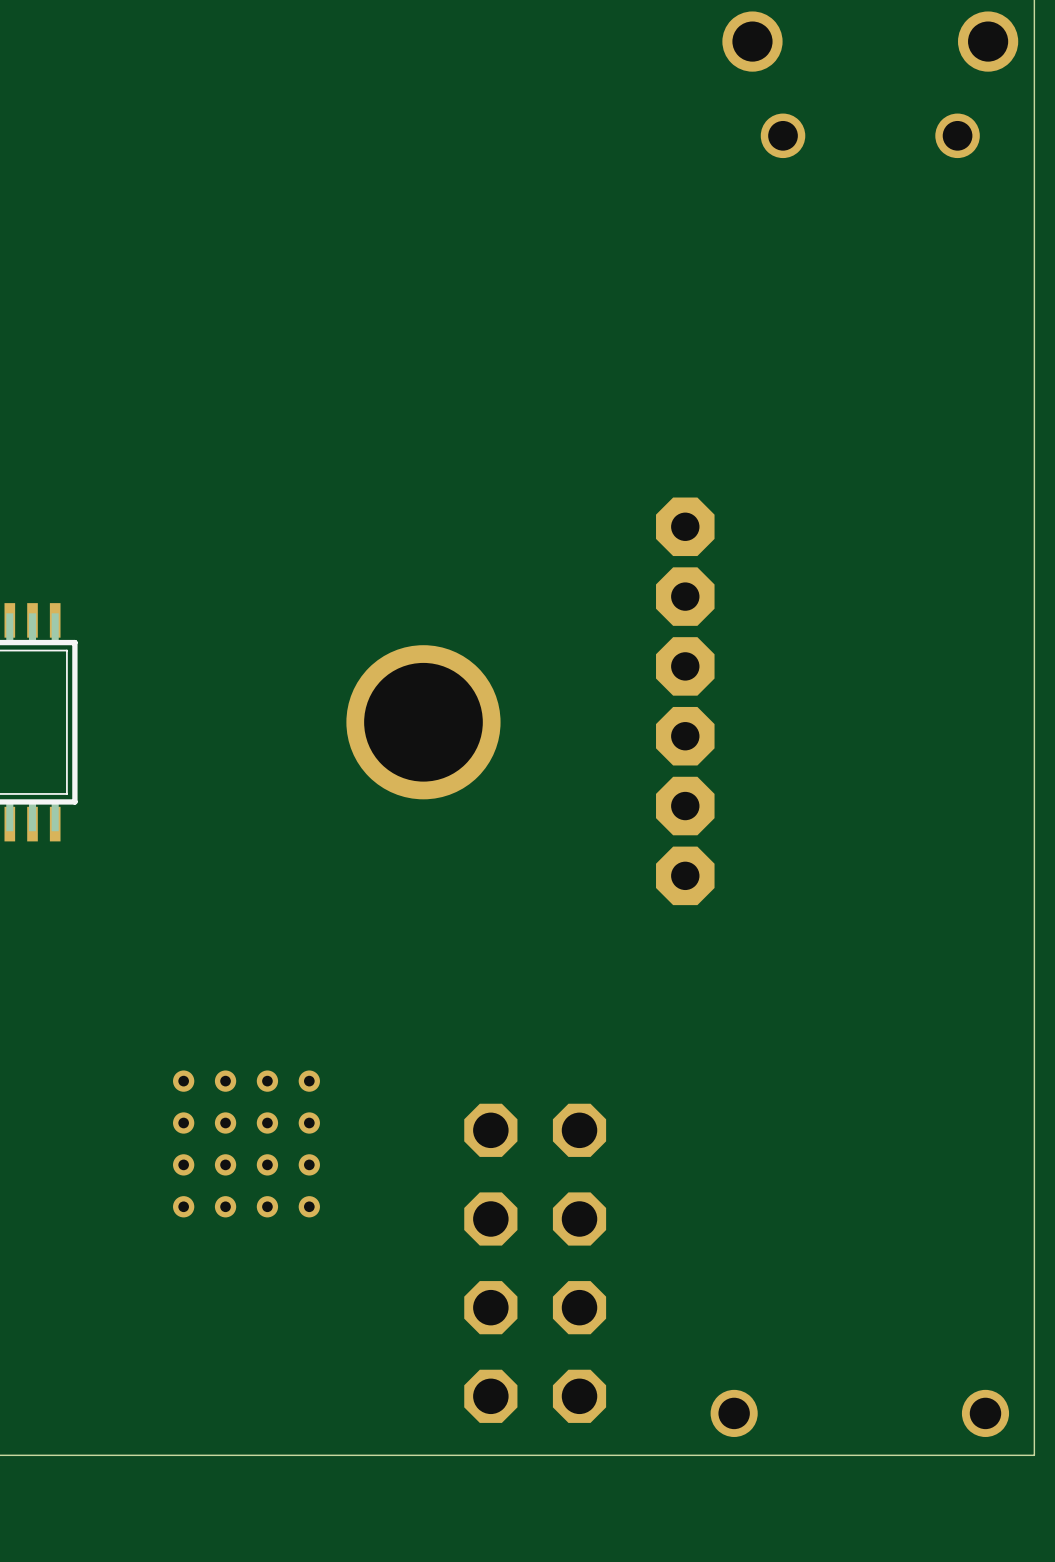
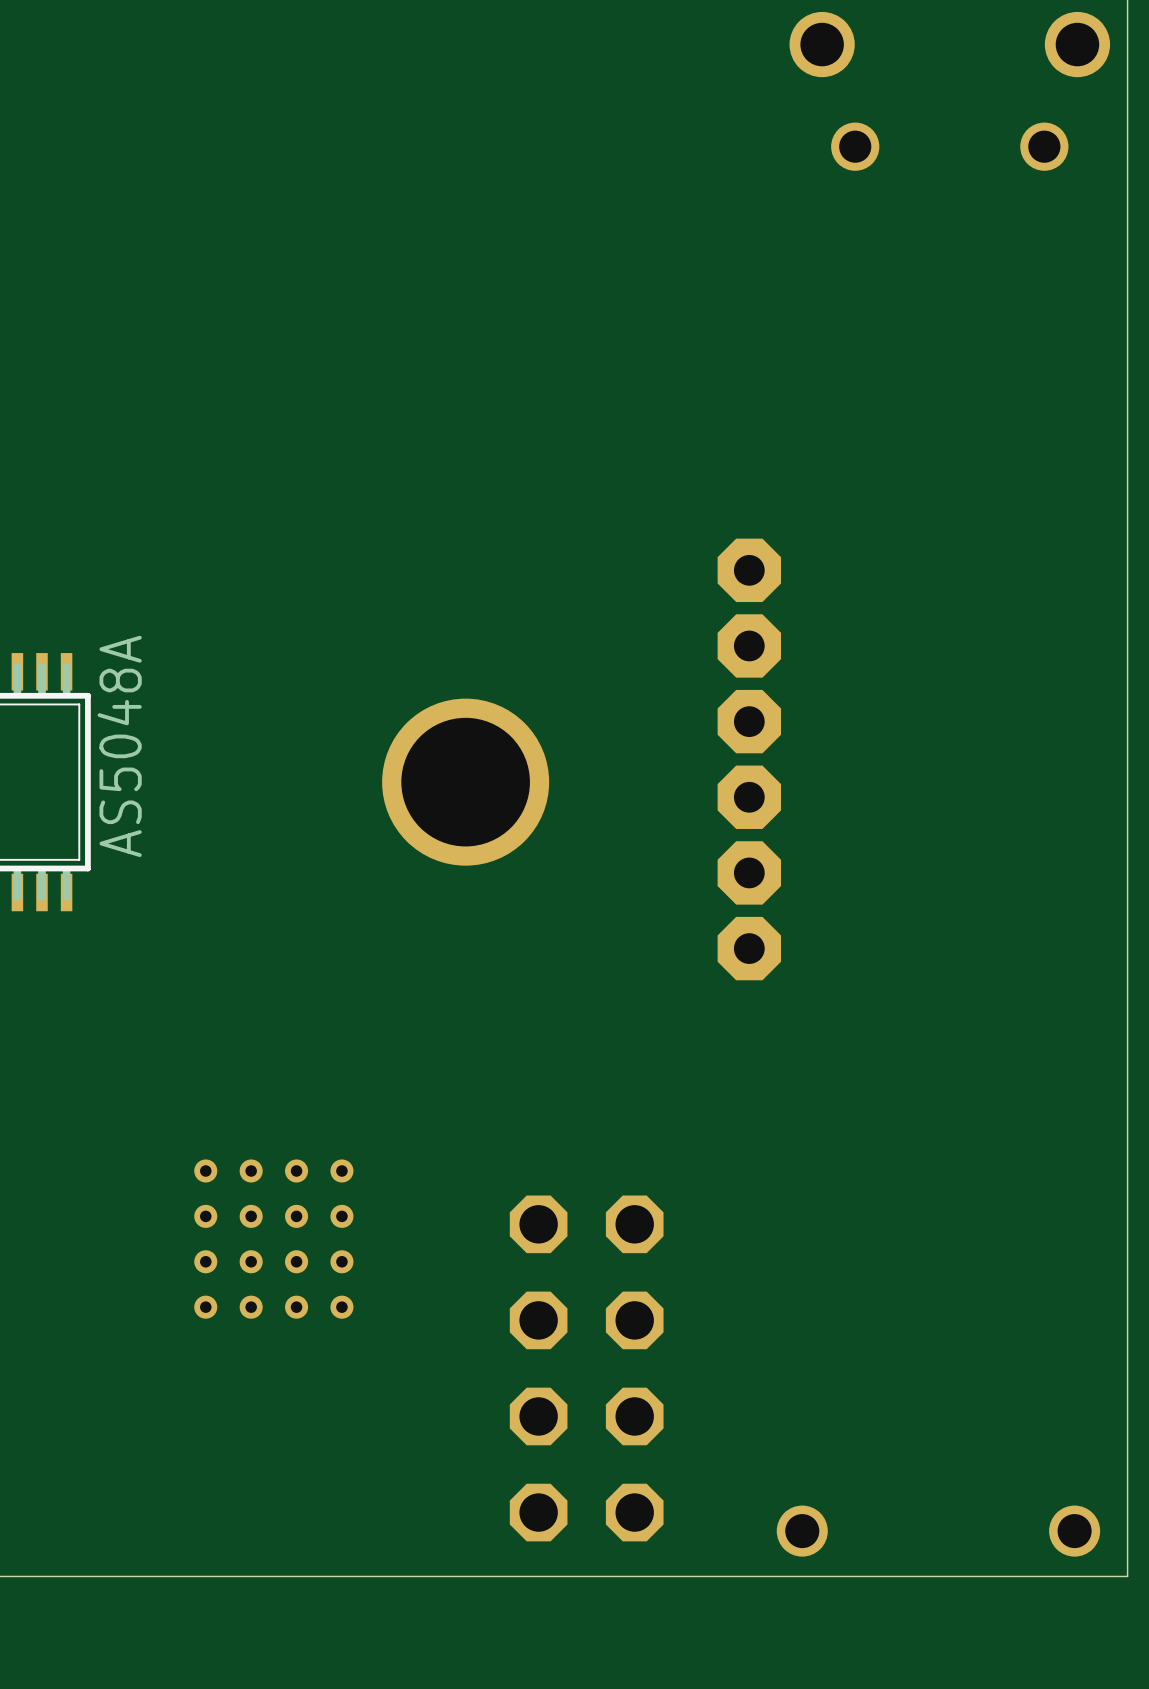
part value: none -> AS5048A (119, 746)

